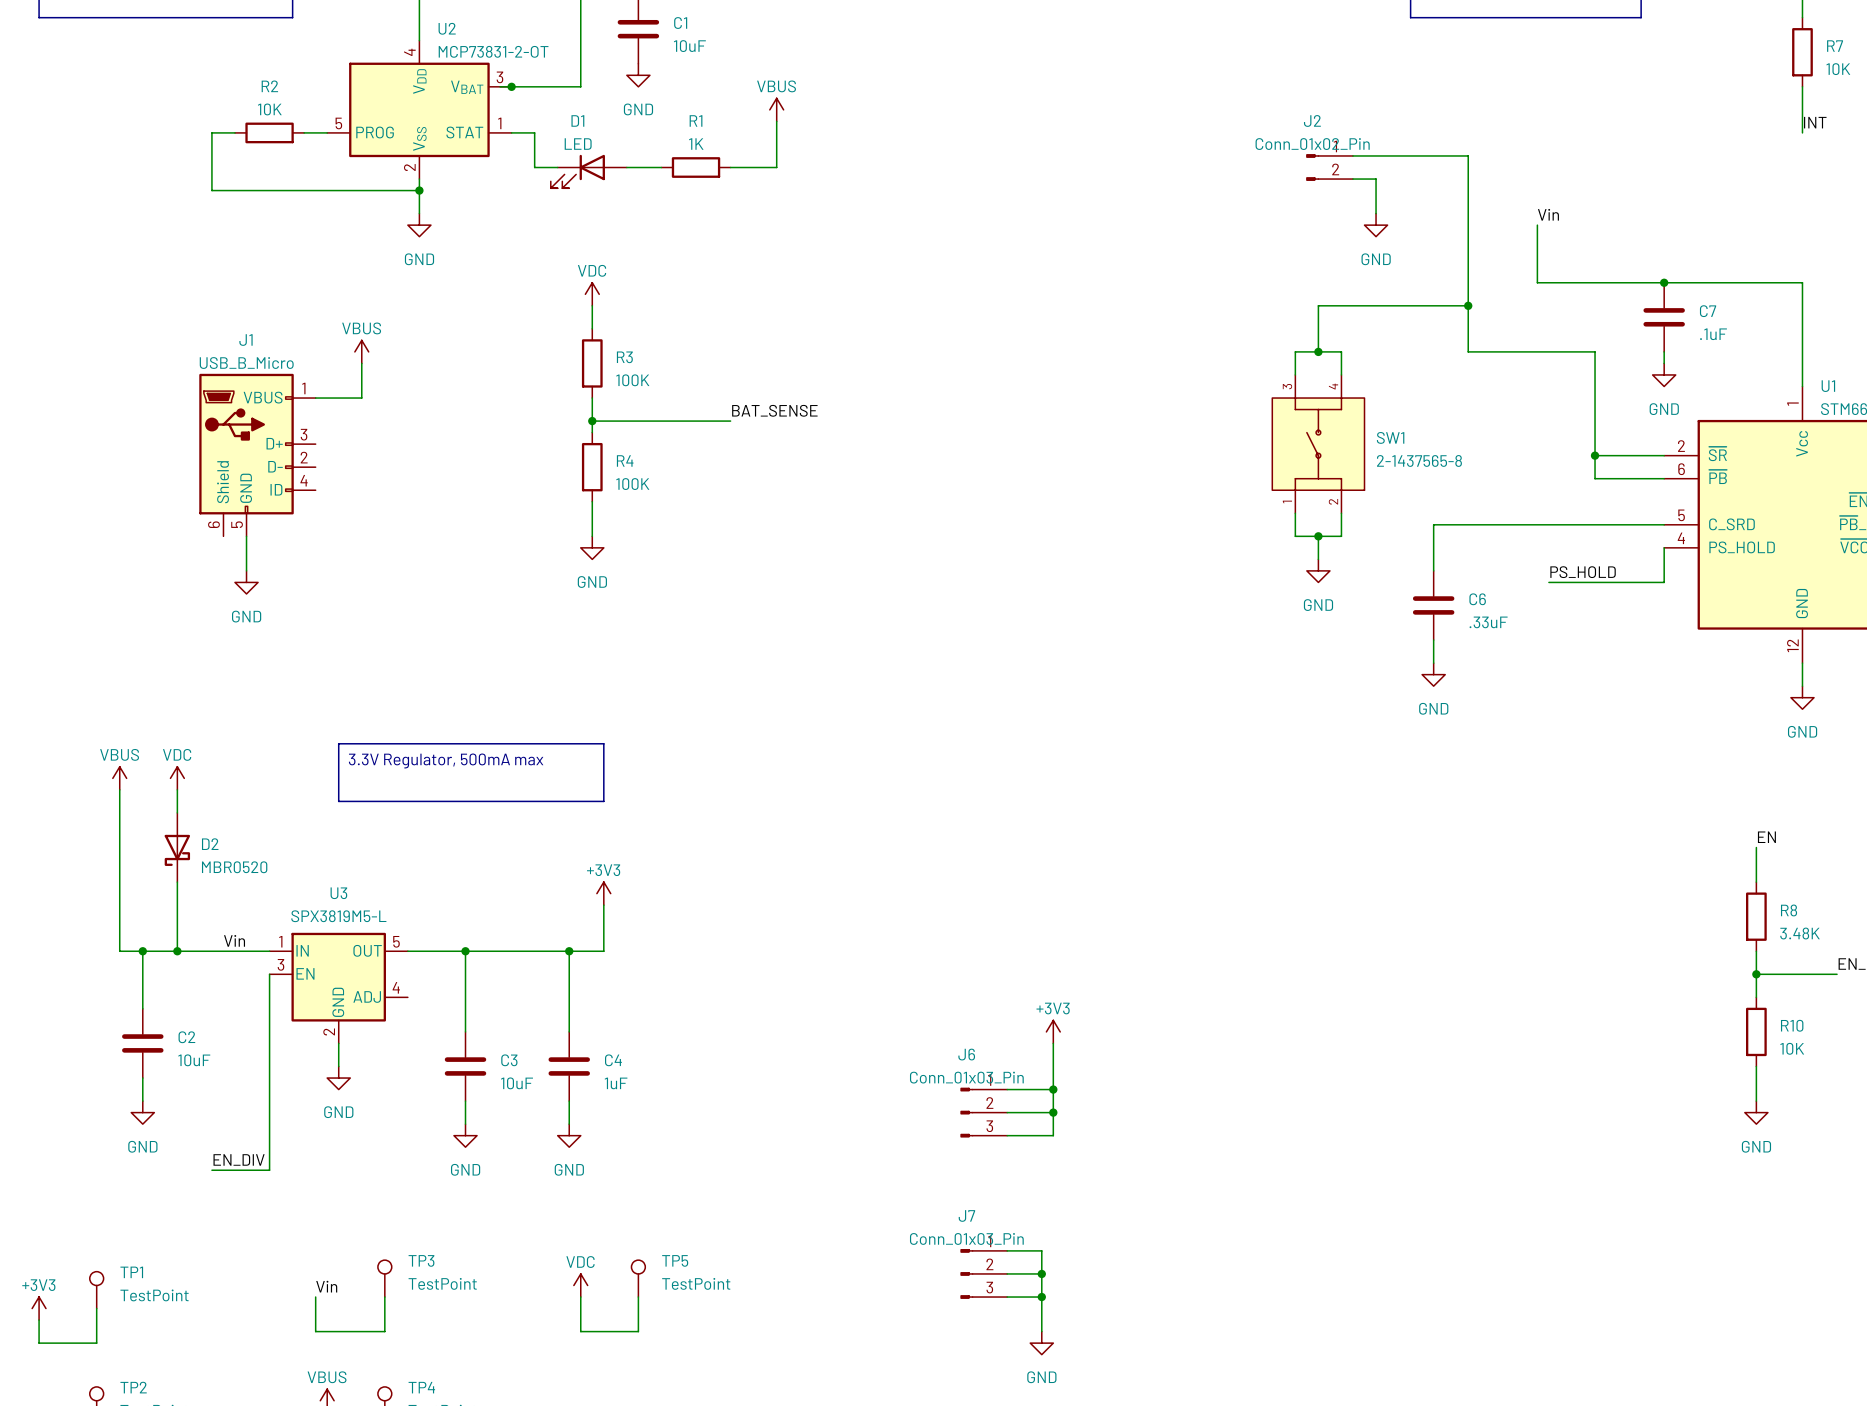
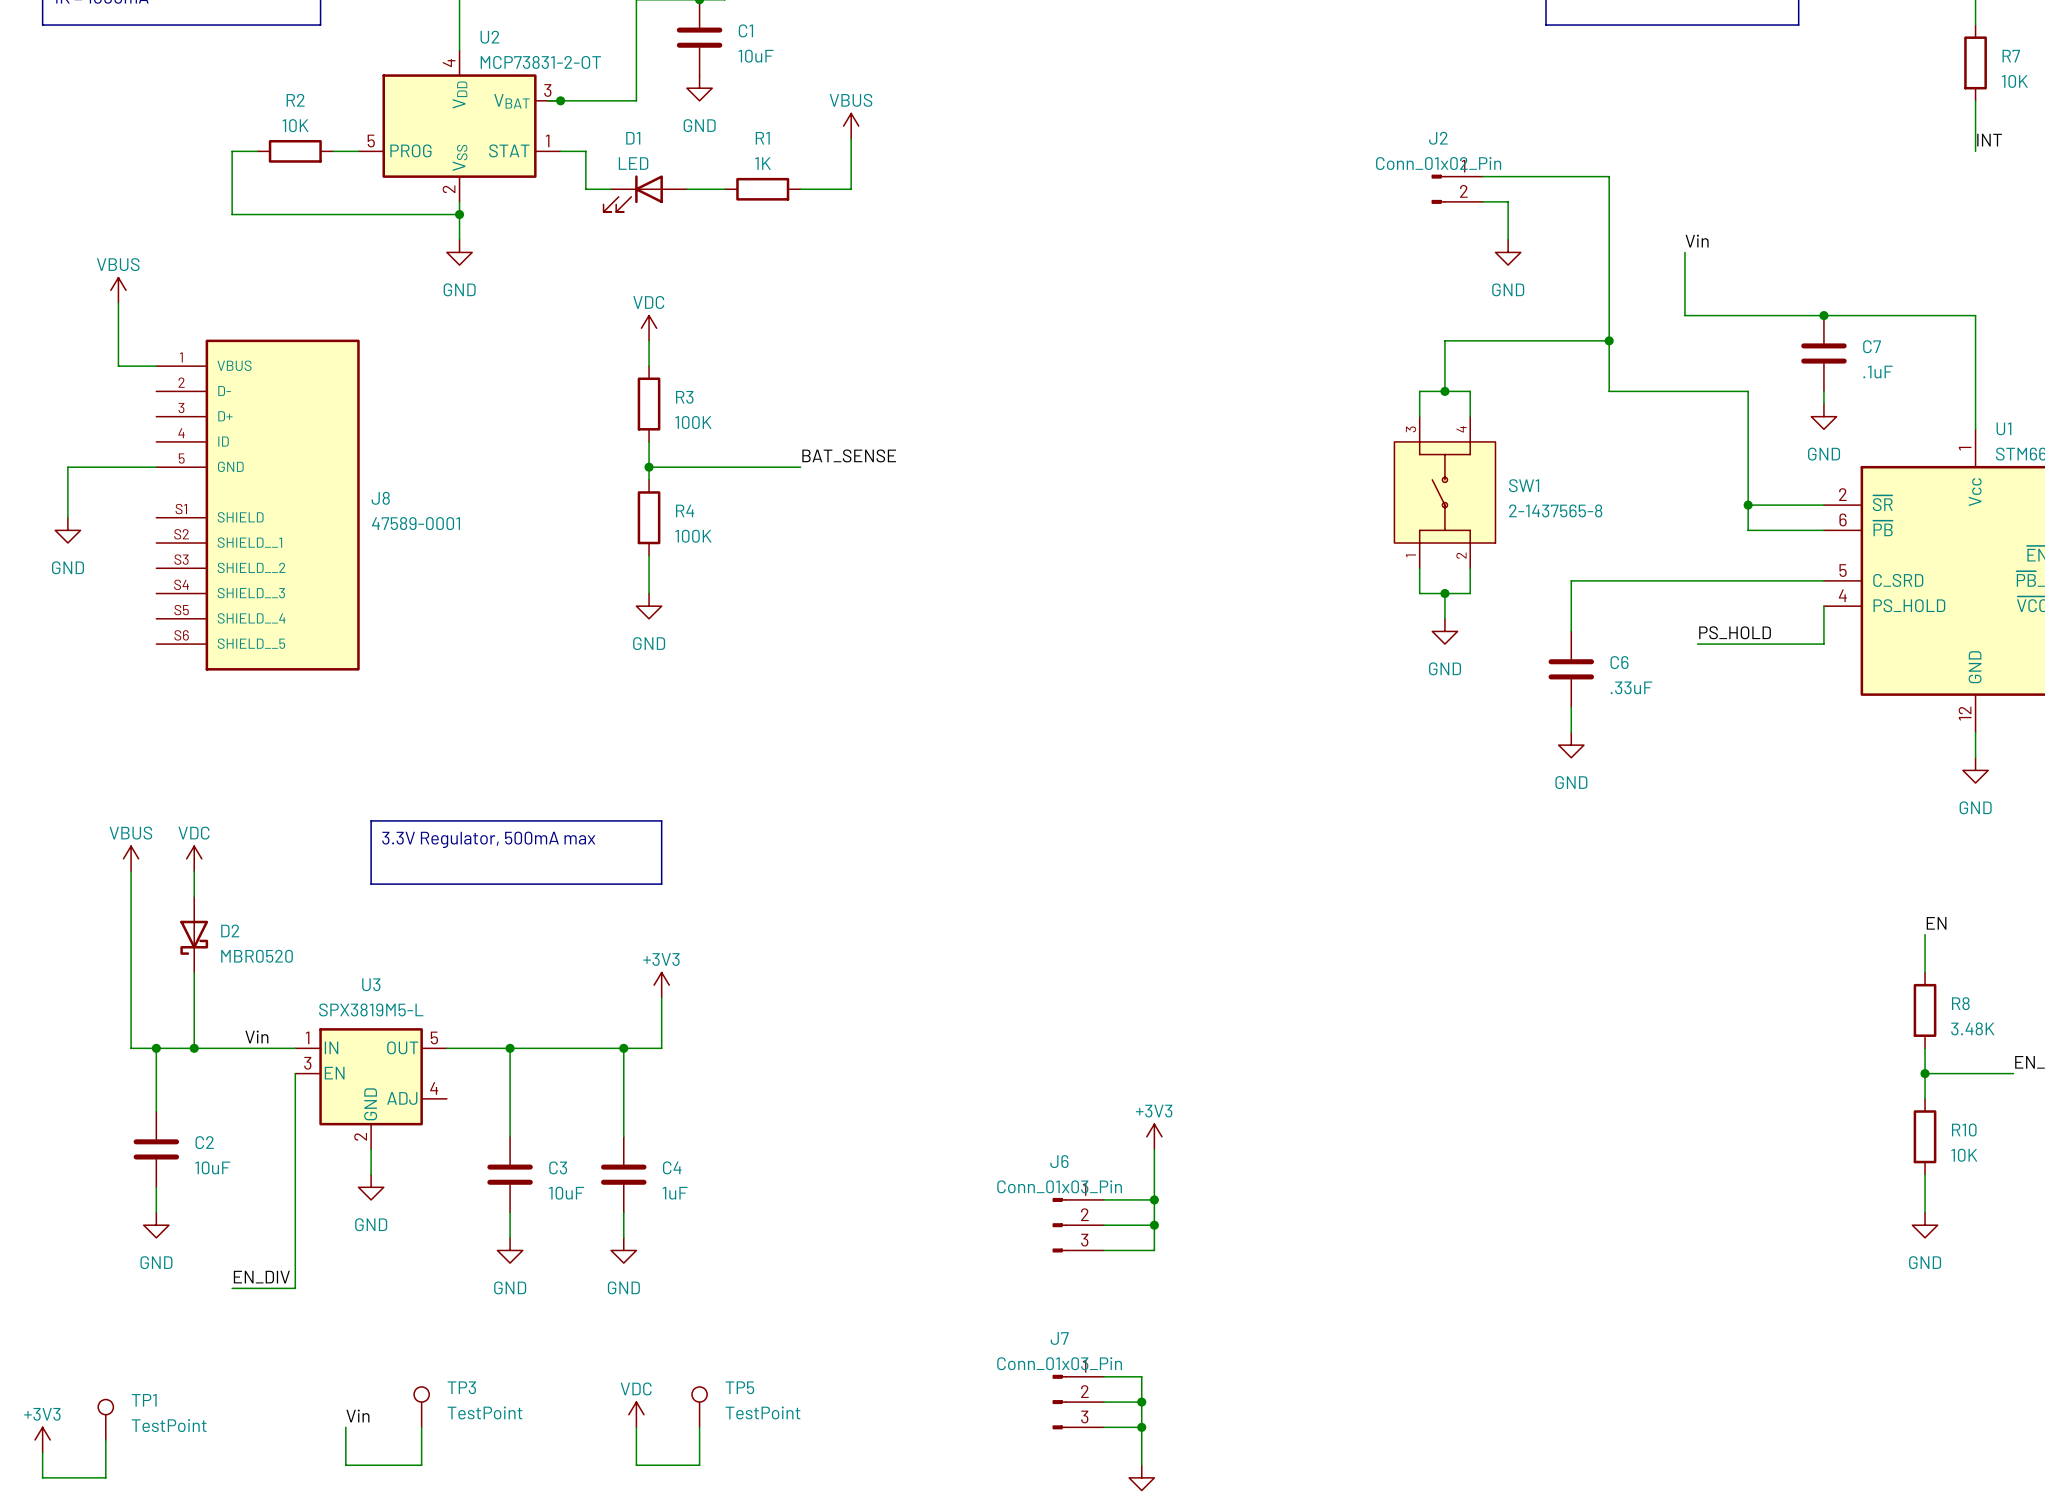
power symbol: none -> VBUS (118, 290)
wire: none -> (118, 302) (118, 366) (156, 366)
power symbol: VBUS (361, 351) -> none
wire: (361, 363) (361, 398) (315, 398) -> none
wire: none -> (156, 467) (67, 467) (67, 517)
J8: none -> 47589-0001 (258, 505)
J1: USB_B_Micro (257, 455) -> none
power symbol position: GND (246, 582) -> GND (67, 530)

